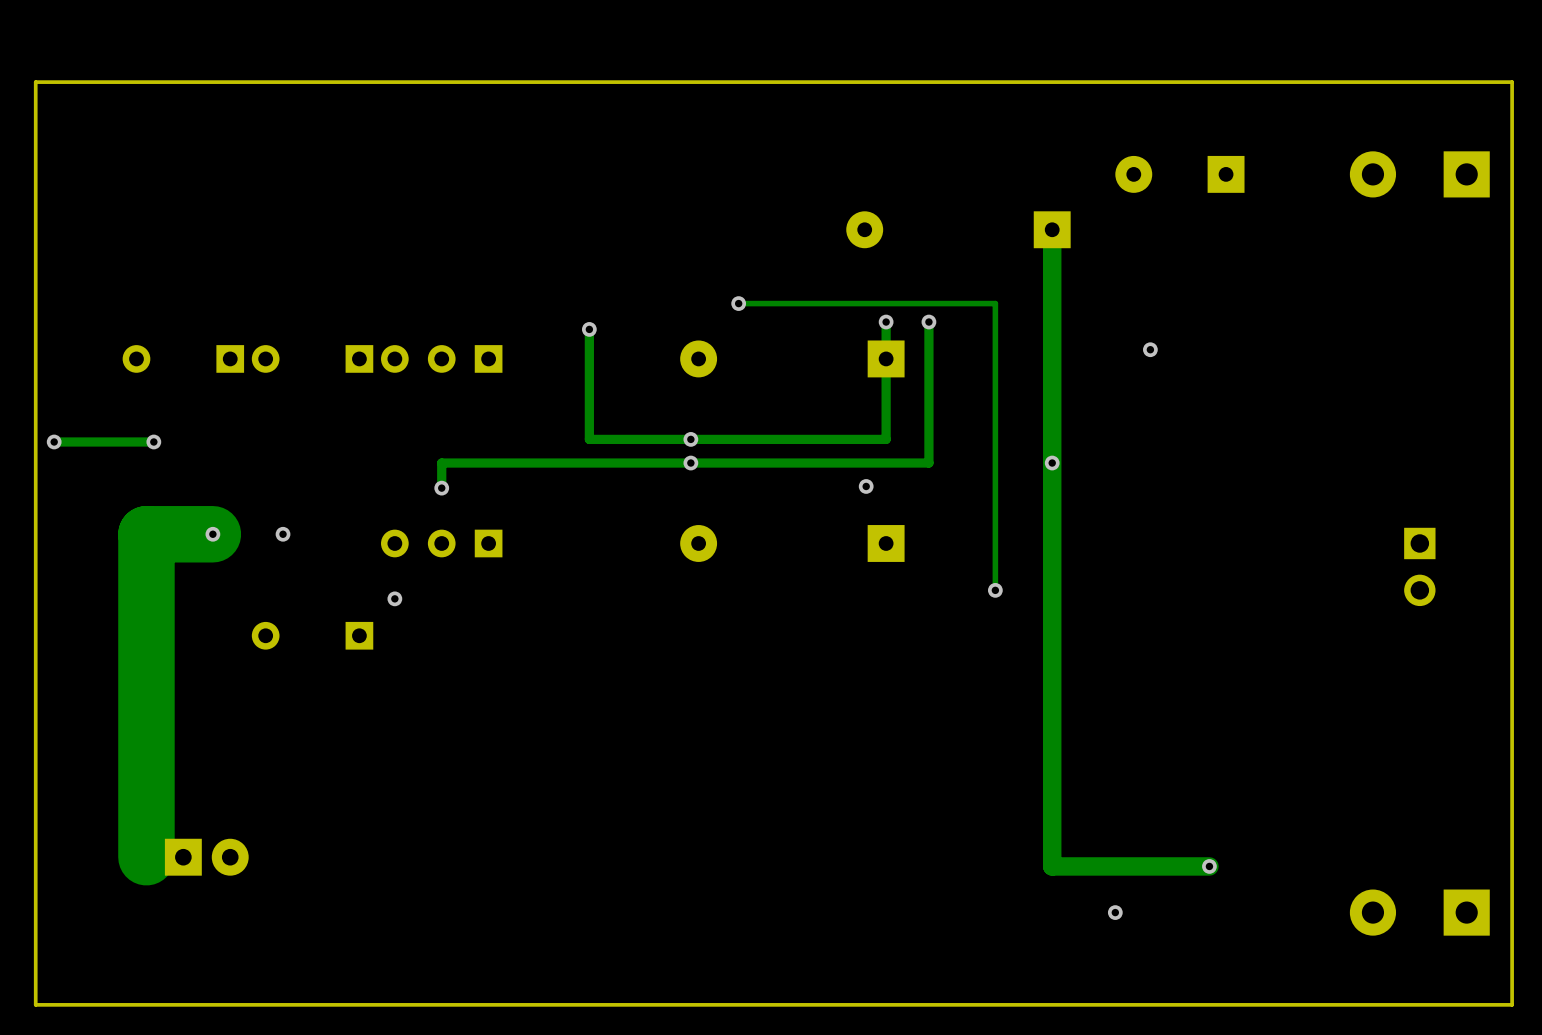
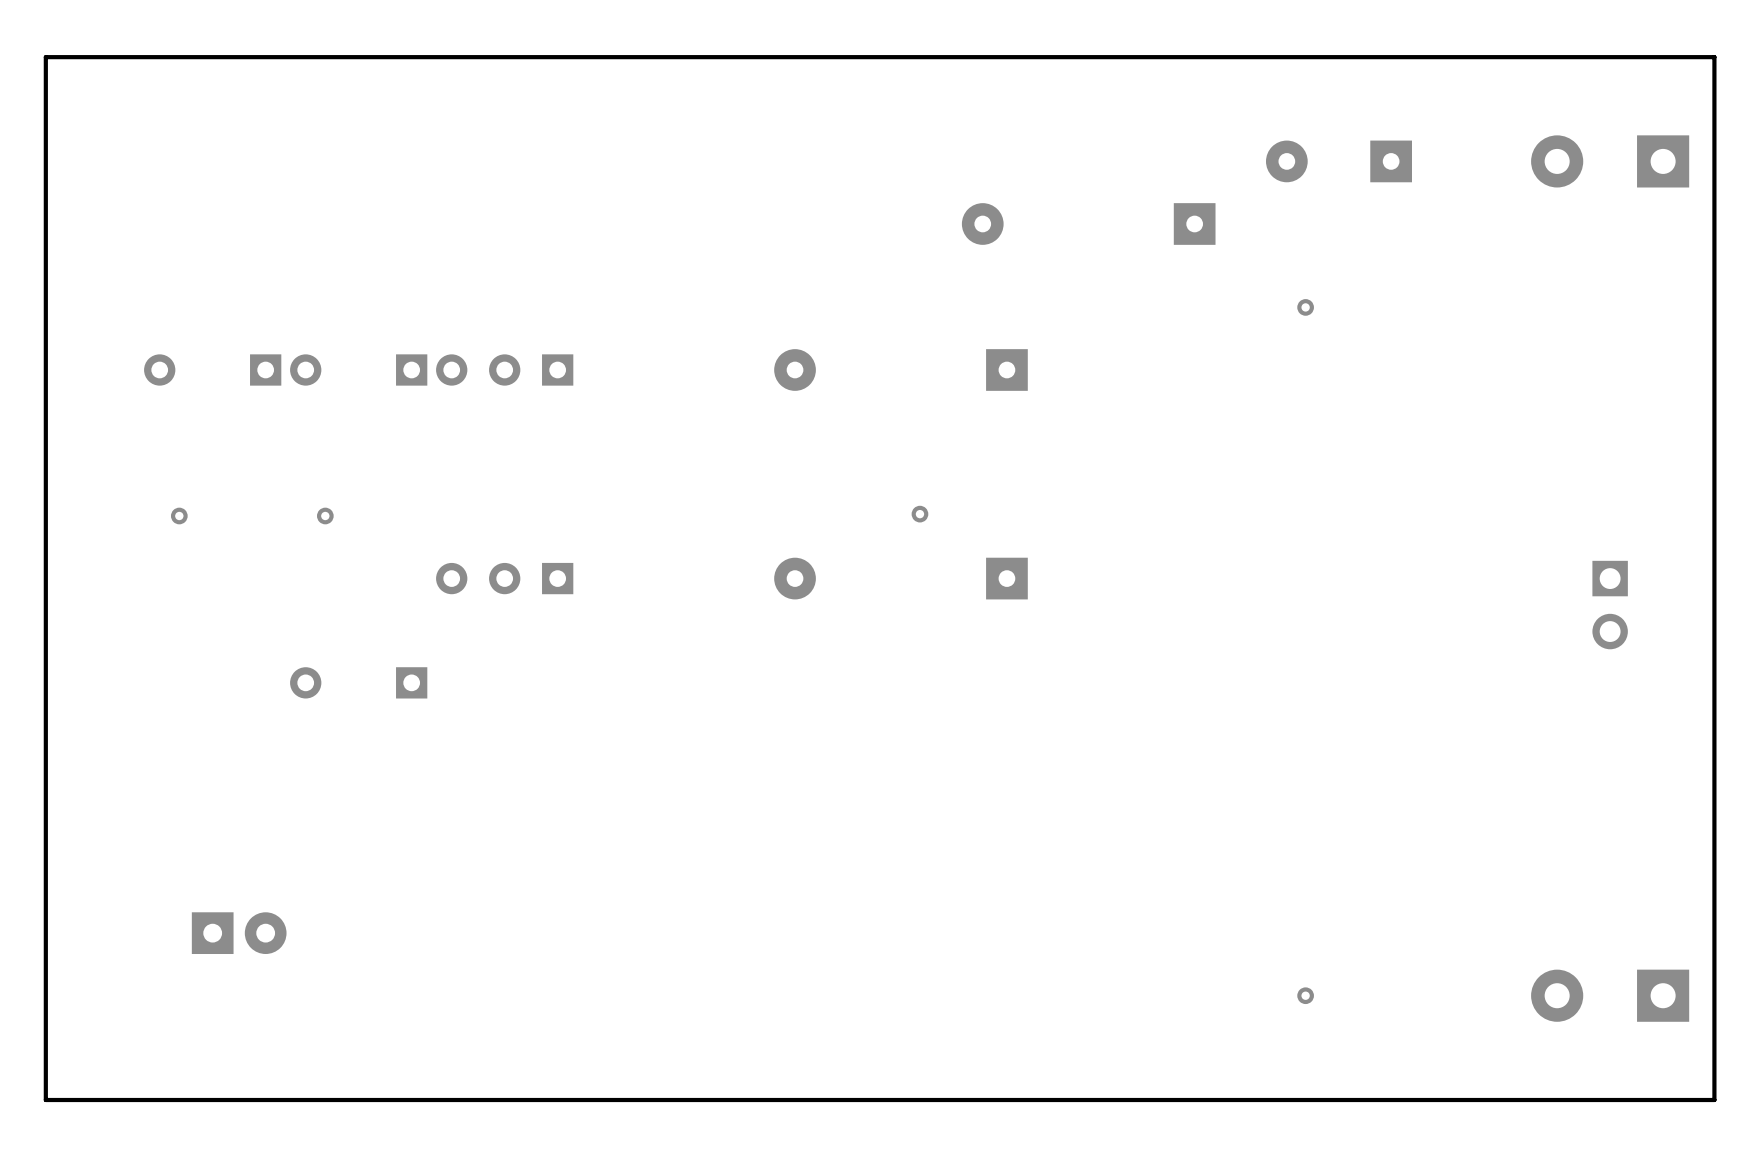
track: (1052, 229) (1052, 866) (1209, 866) -> none
track: (738, 303) (995, 303) (995, 590) -> none
via: (738, 303) -> none
track: (886, 322) (886, 439) (589, 439) (589, 329) -> none
via: (886, 322) -> none
track: (928, 322) (928, 463) (441, 463) (441, 488) -> none
via: (928, 322) -> none
via: (589, 329) -> none
via position: (1150, 349) -> (1305, 307)
via: (690, 439) -> none
via: (54, 441) -> none
track: (153, 441) (54, 441) -> none
via: (153, 441) -> none
via: (690, 463) -> none
via: (1052, 463) -> none
via position: (866, 486) -> (919, 514)
via: none -> (179, 516)
via: none -> (325, 516)
via: (441, 488) -> none
track: (212, 534) (146, 534) (146, 857) (183, 857) -> none
via: (212, 534) -> none
via: (283, 534) -> none
via: (995, 590) -> none
via: (394, 598) -> none
via: (1209, 866) -> none
via position: (1115, 912) -> (1305, 995)

